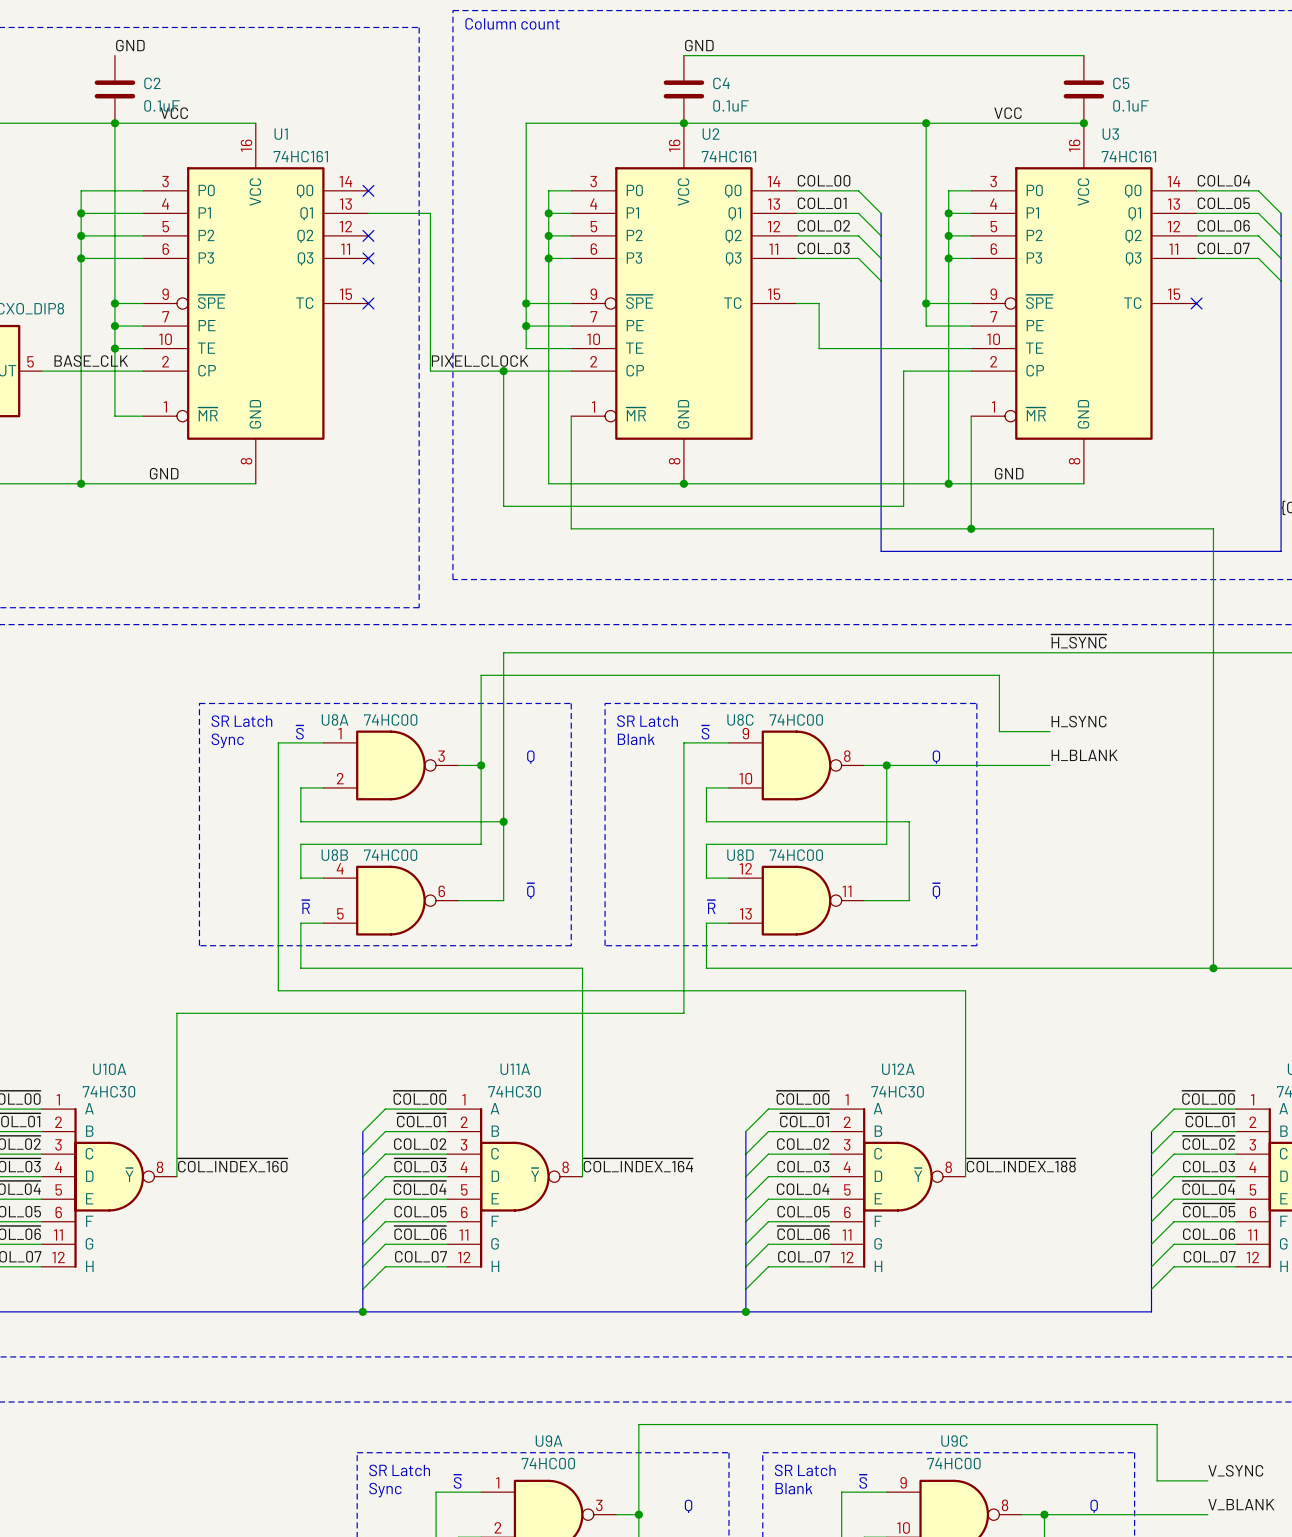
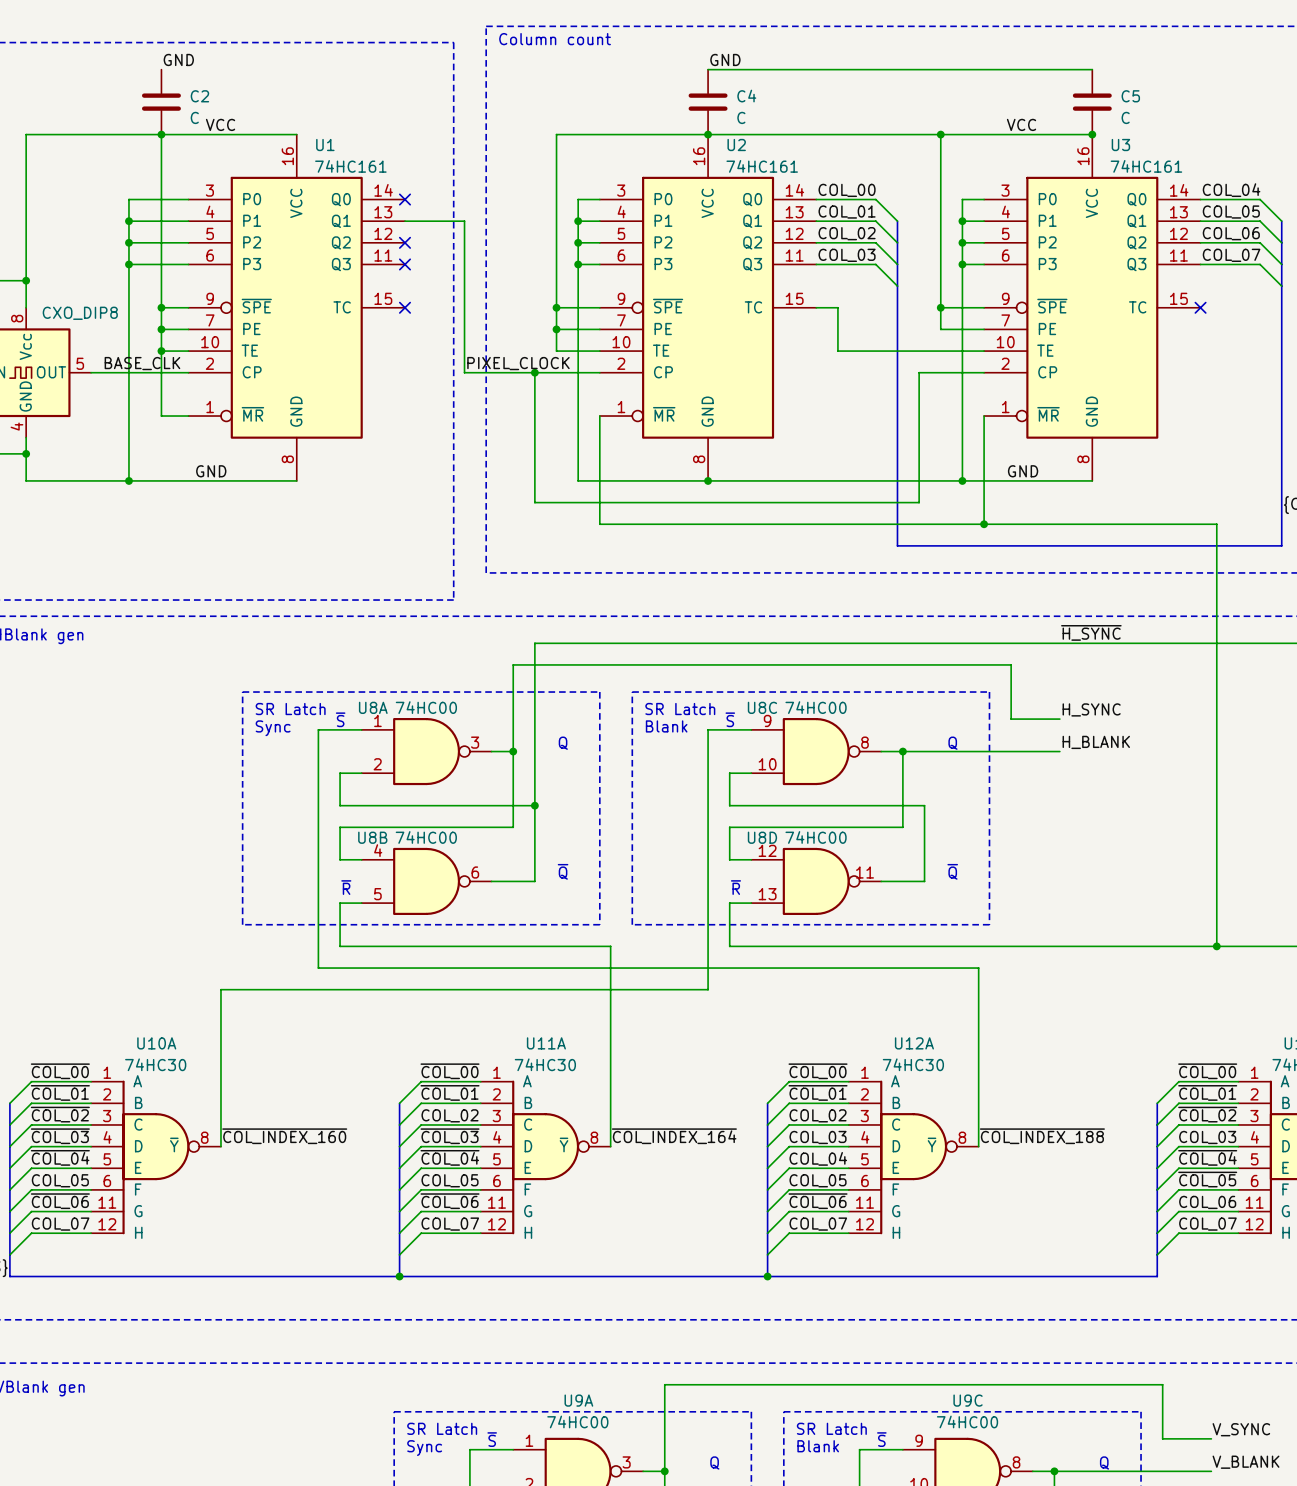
C2 value: 0.1uF (162, 105) -> C (194, 117)
C4 value: 0.1uF (730, 105) -> C (741, 117)
C5 value: 0.1uF (1130, 105) -> C (1125, 117)

